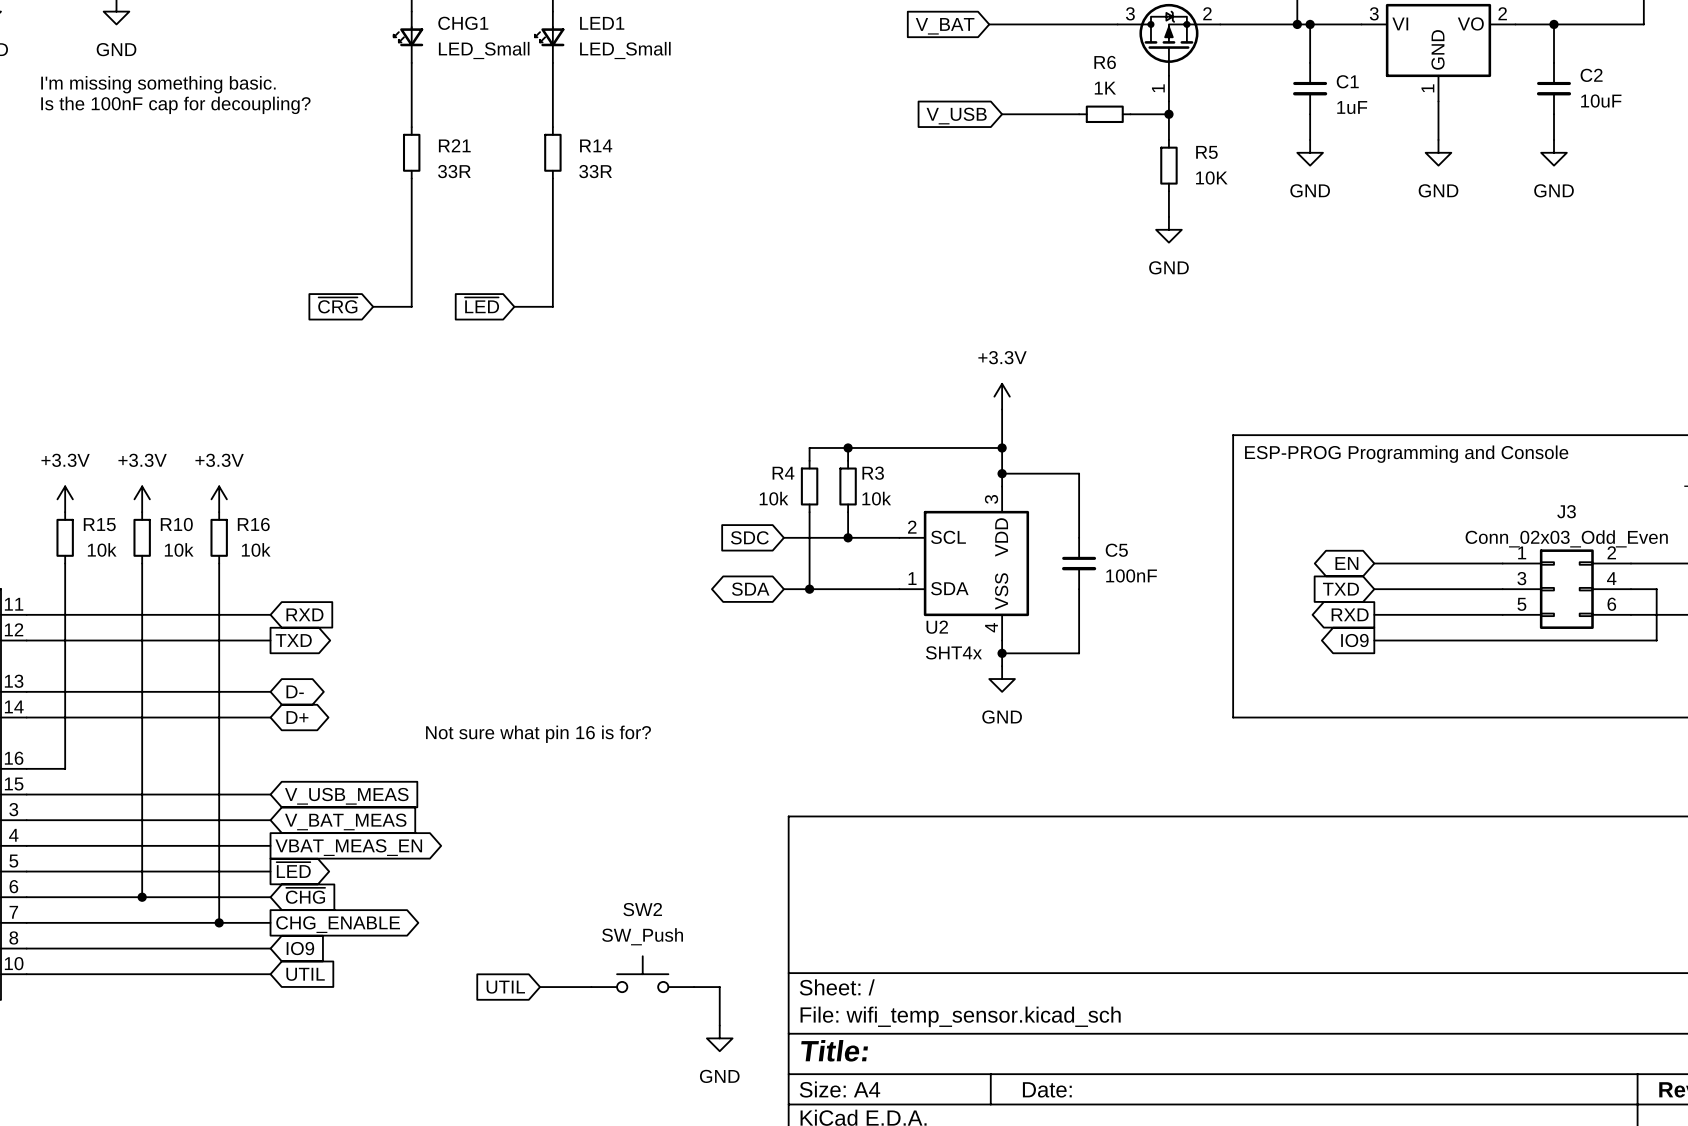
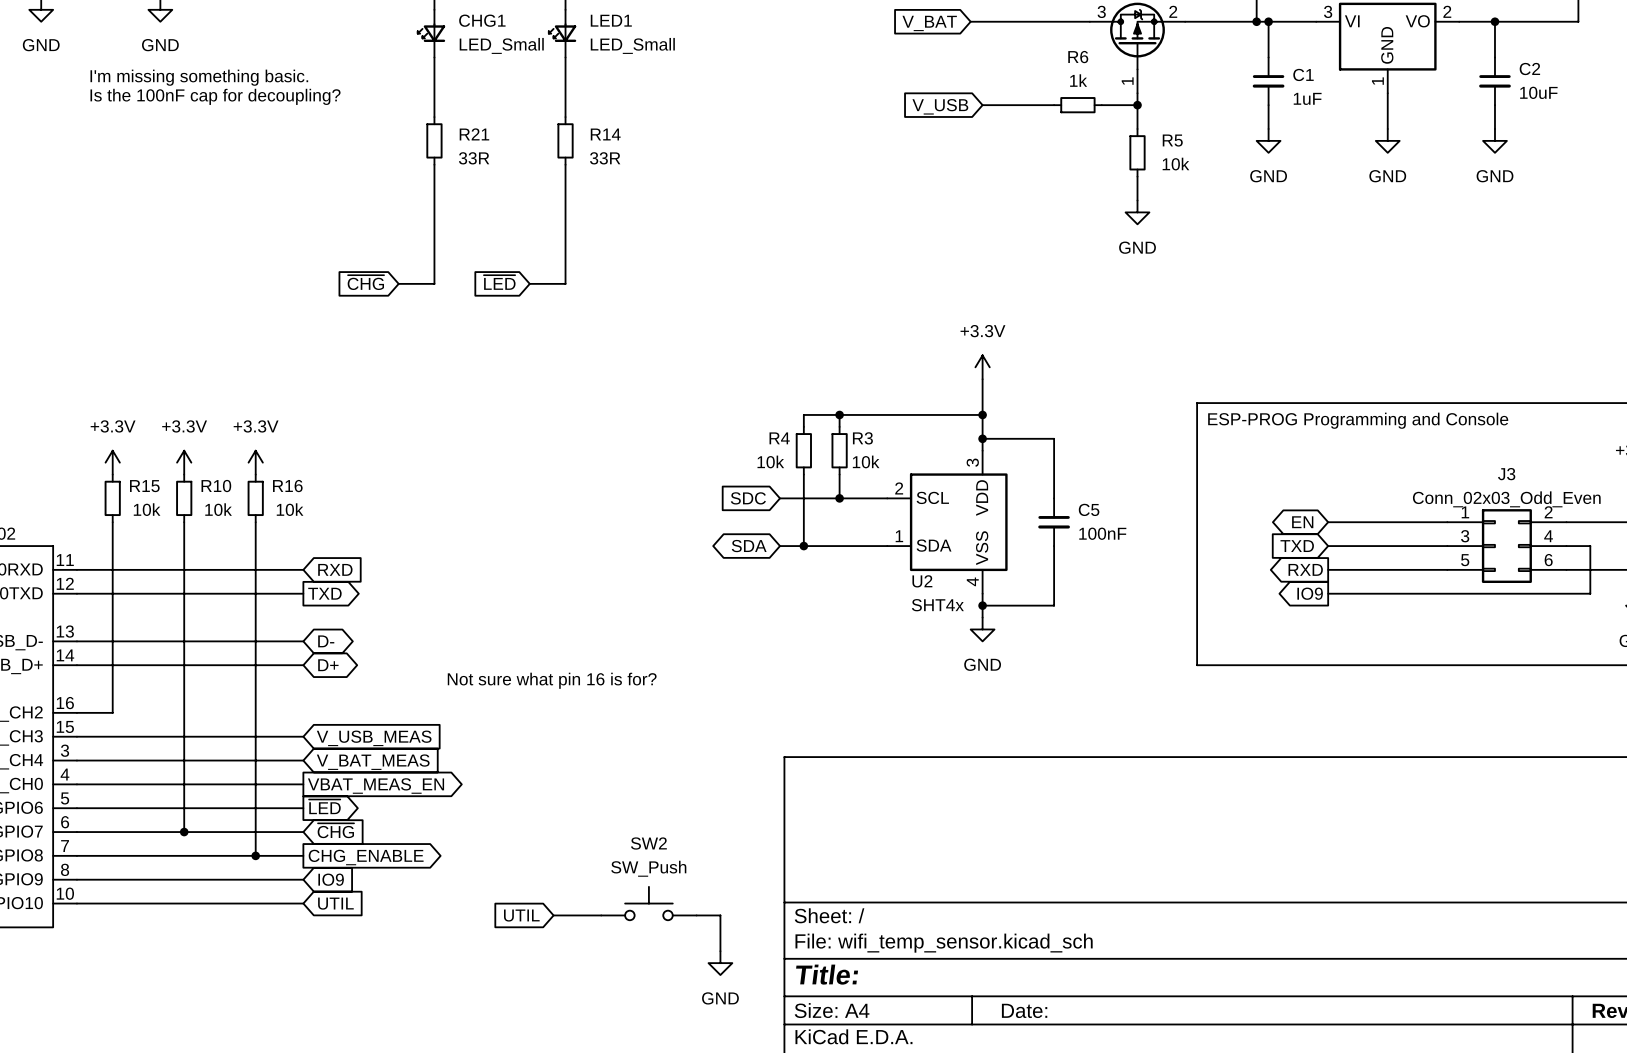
R6 value: 1K (1105, 88) -> 1k (1078, 80)
R5 value: 10K (1211, 177) -> 10k (1175, 164)
global label: ~{CRG} (337, 305) -> ~{CHG} (365, 282)

